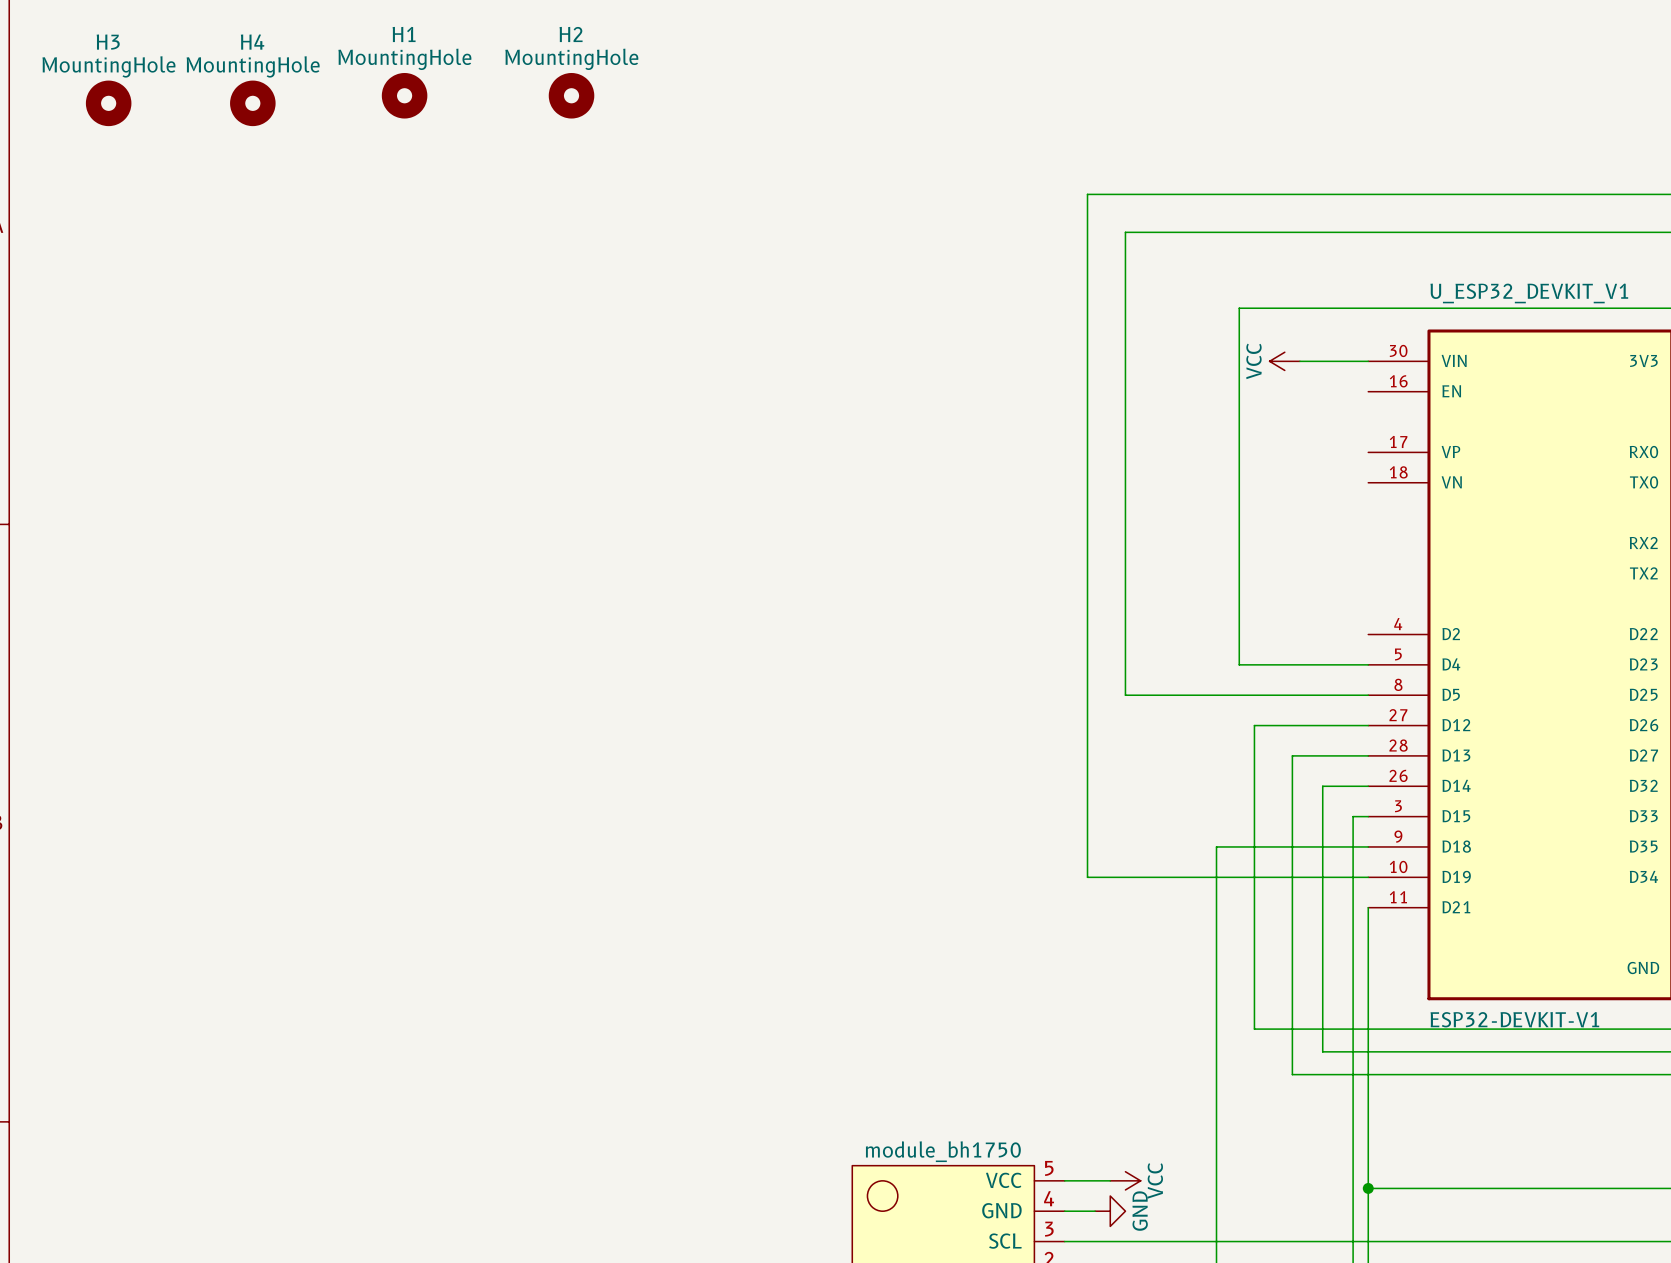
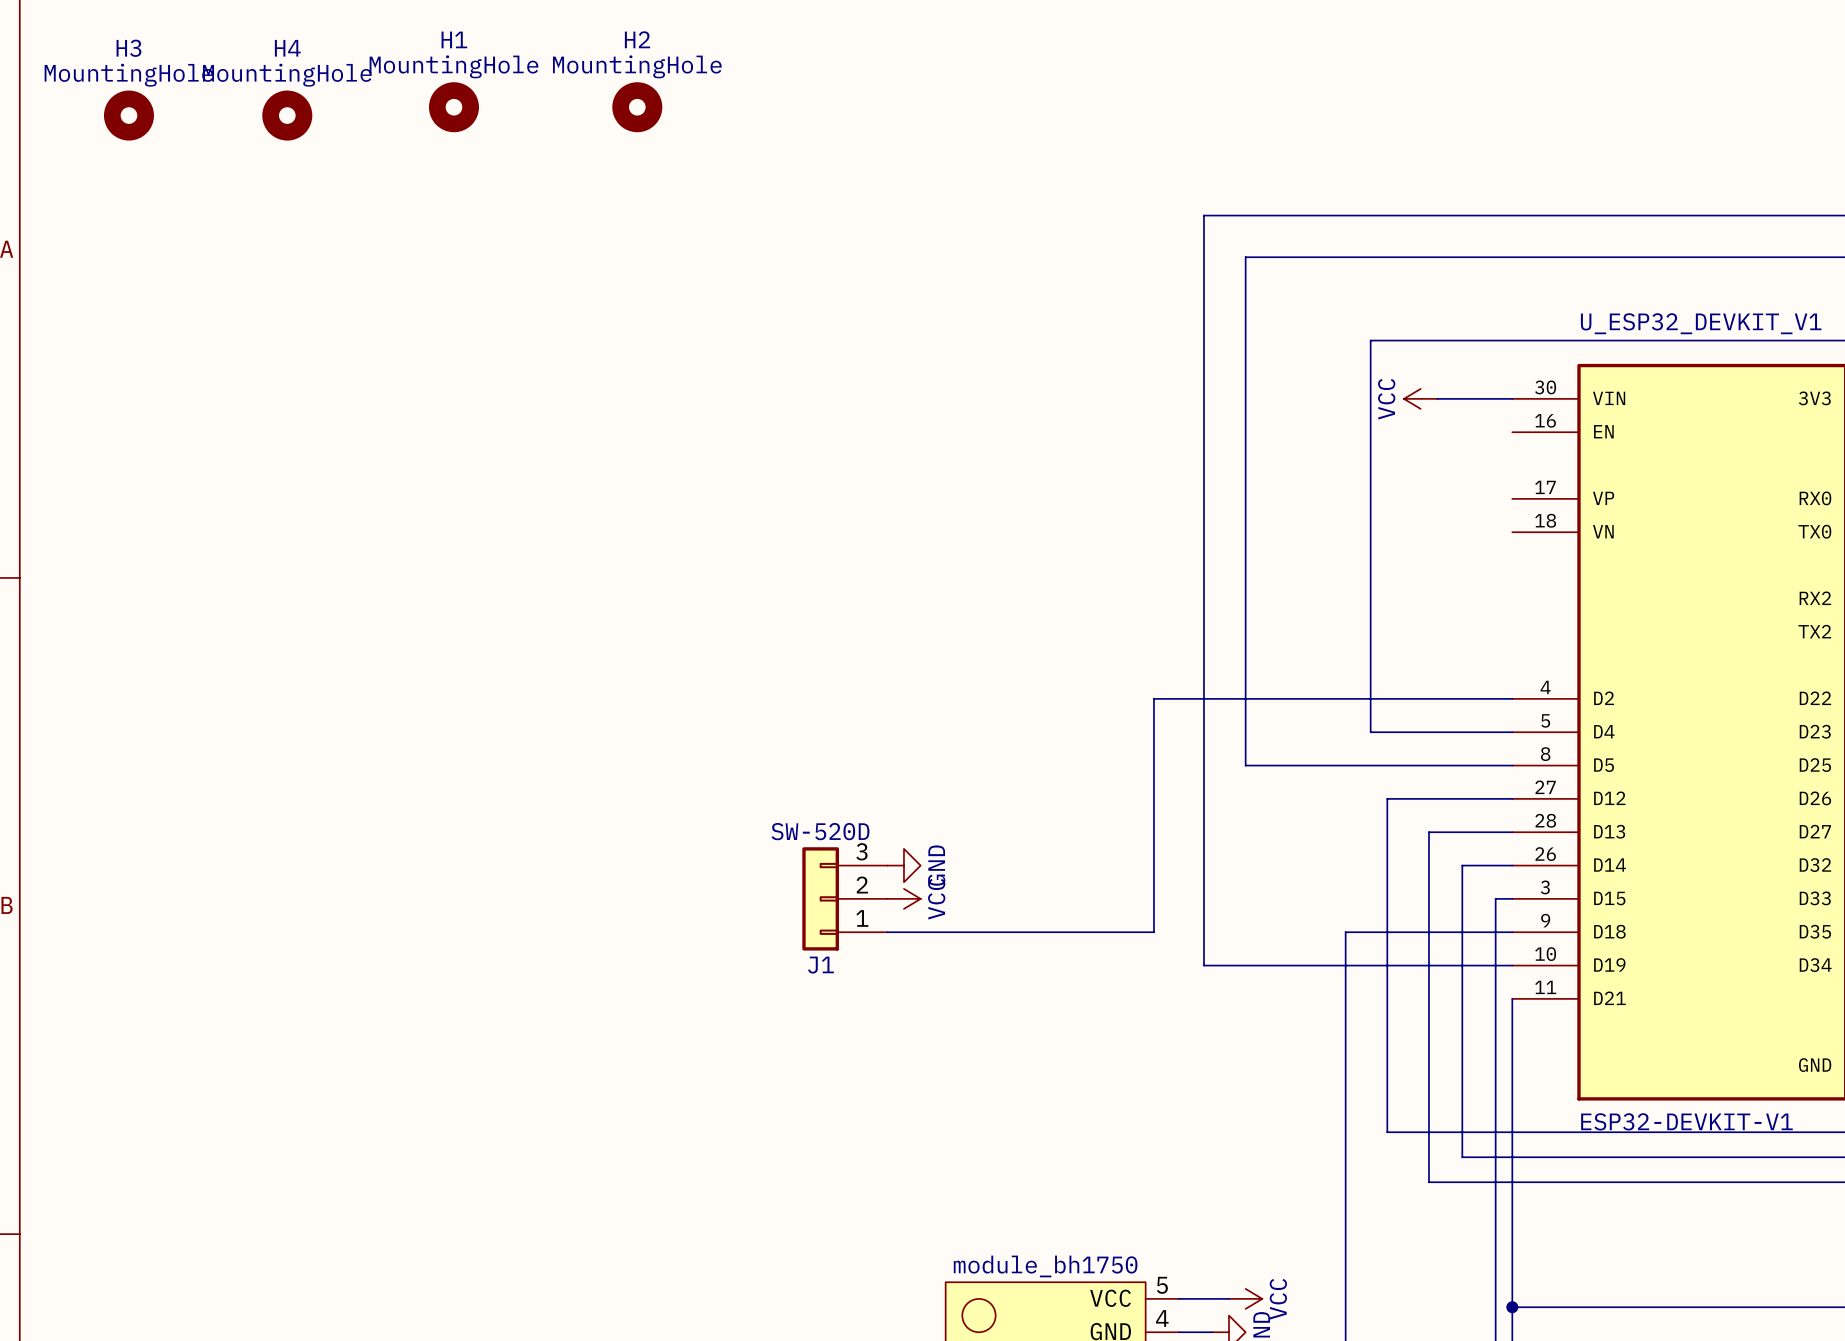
wire: none -> (1512, 698) (1153, 698) (1153, 932) (887, 932)
power symbol: none -> GND (903, 865)
J1: none -> SW-520D (844, 898)
power symbol: none -> VCC (903, 898)

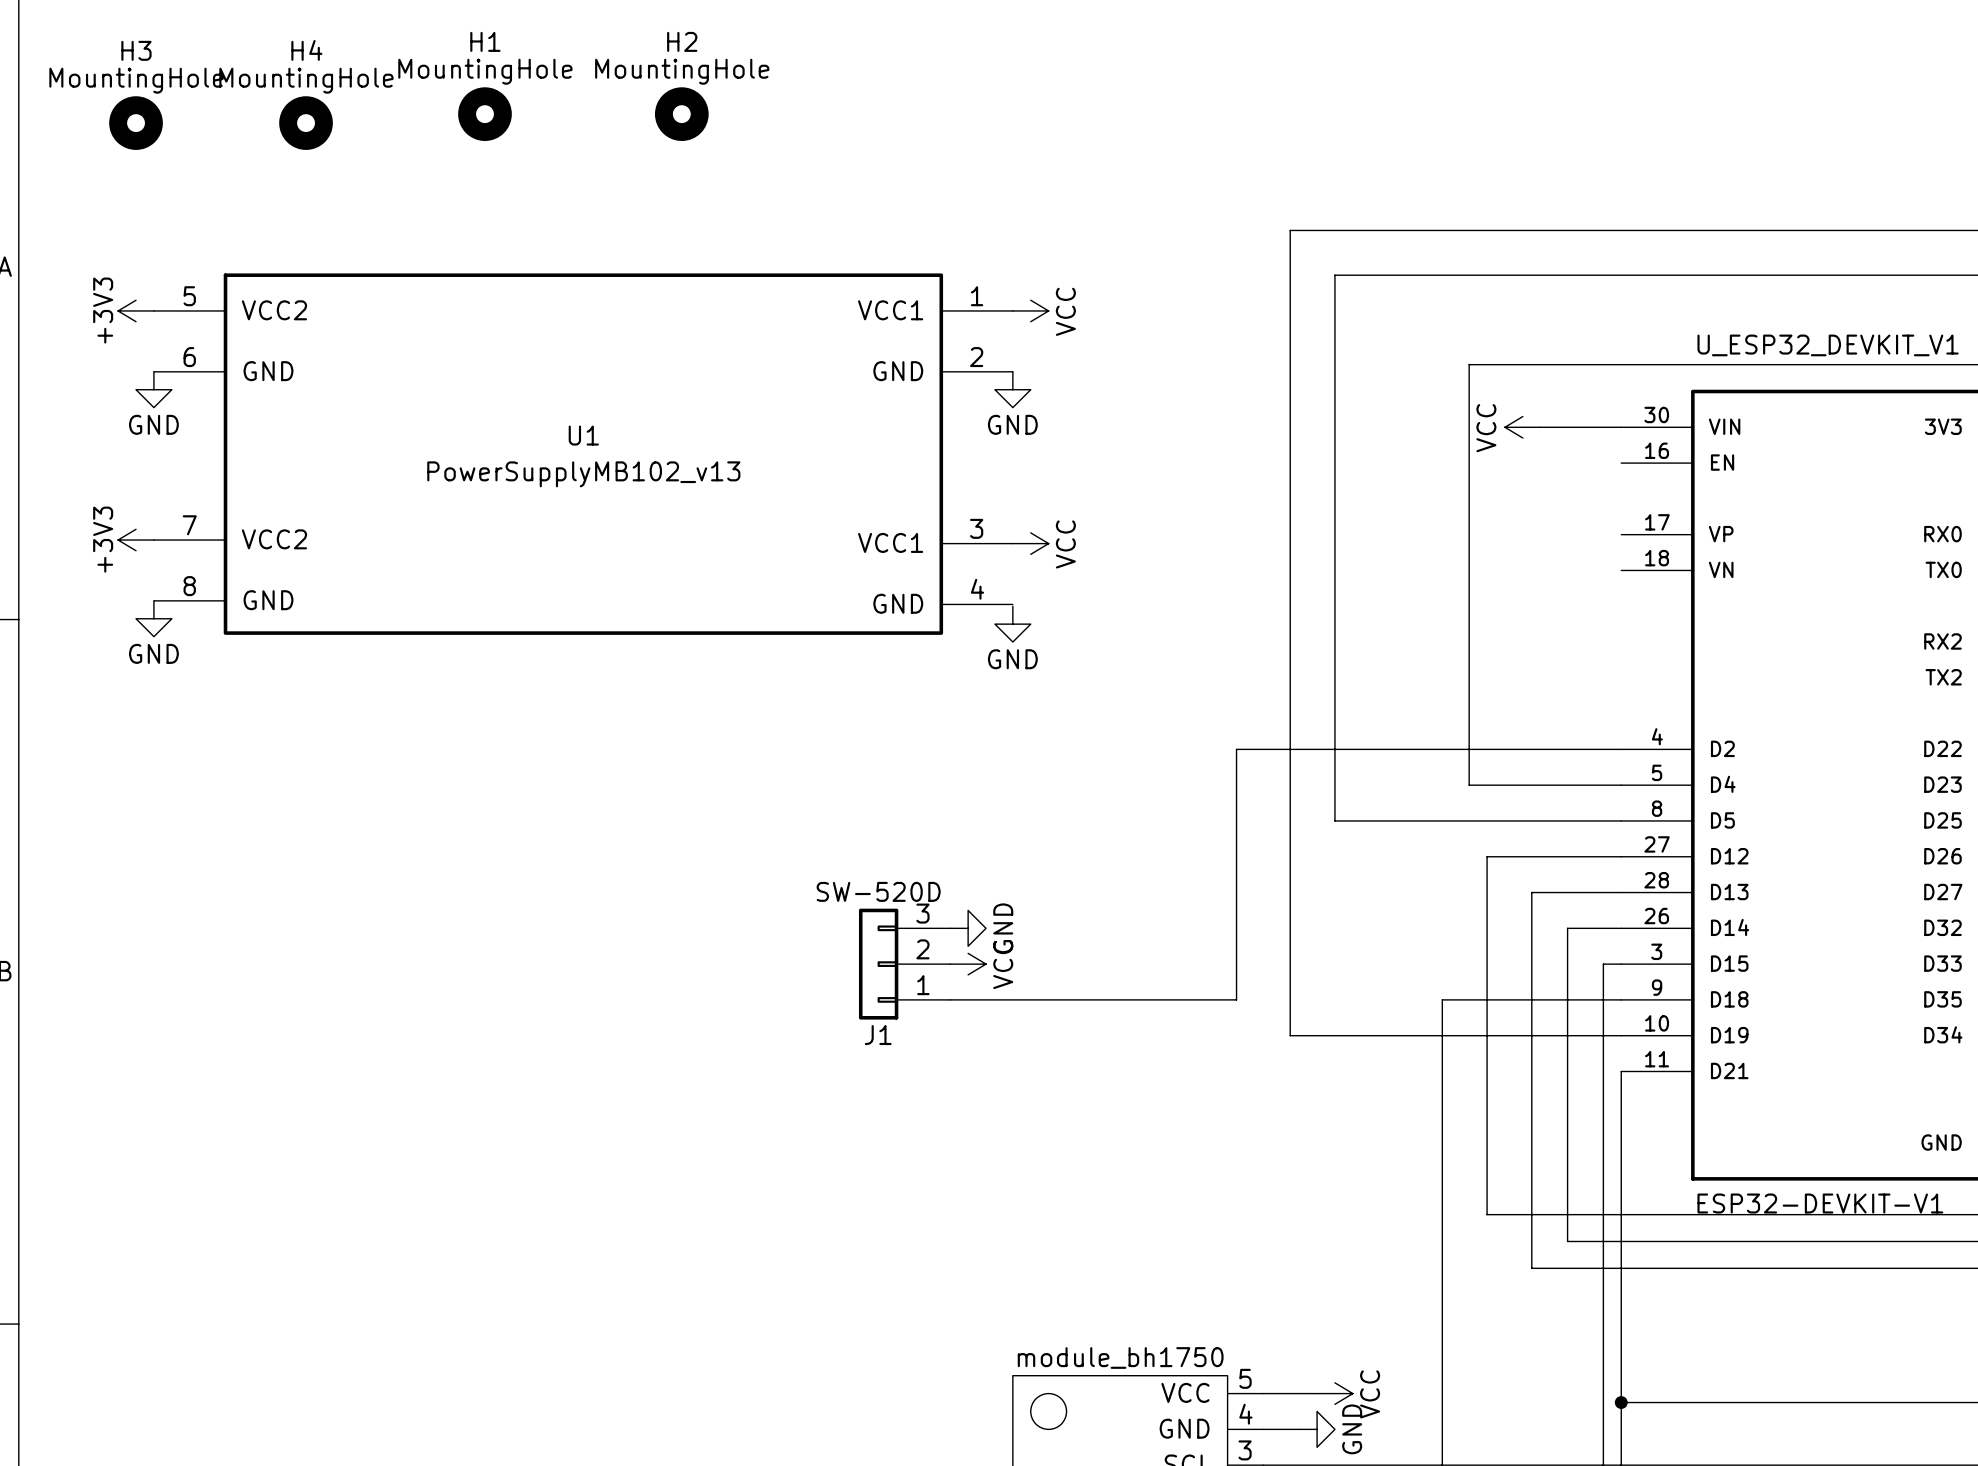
power symbol: none -> +3V3 (136, 310)
power symbol: none -> VCC (1030, 310)
power symbol: none -> GND (153, 389)
power symbol: none -> GND (1012, 389)
U1: none -> PowerSupplyMB102_v13 (583, 454)
power symbol: none -> +3V3 (136, 540)
power symbol: none -> VCC (1030, 543)
power symbol: none -> GND (153, 618)
power symbol: none -> GND (1012, 624)

